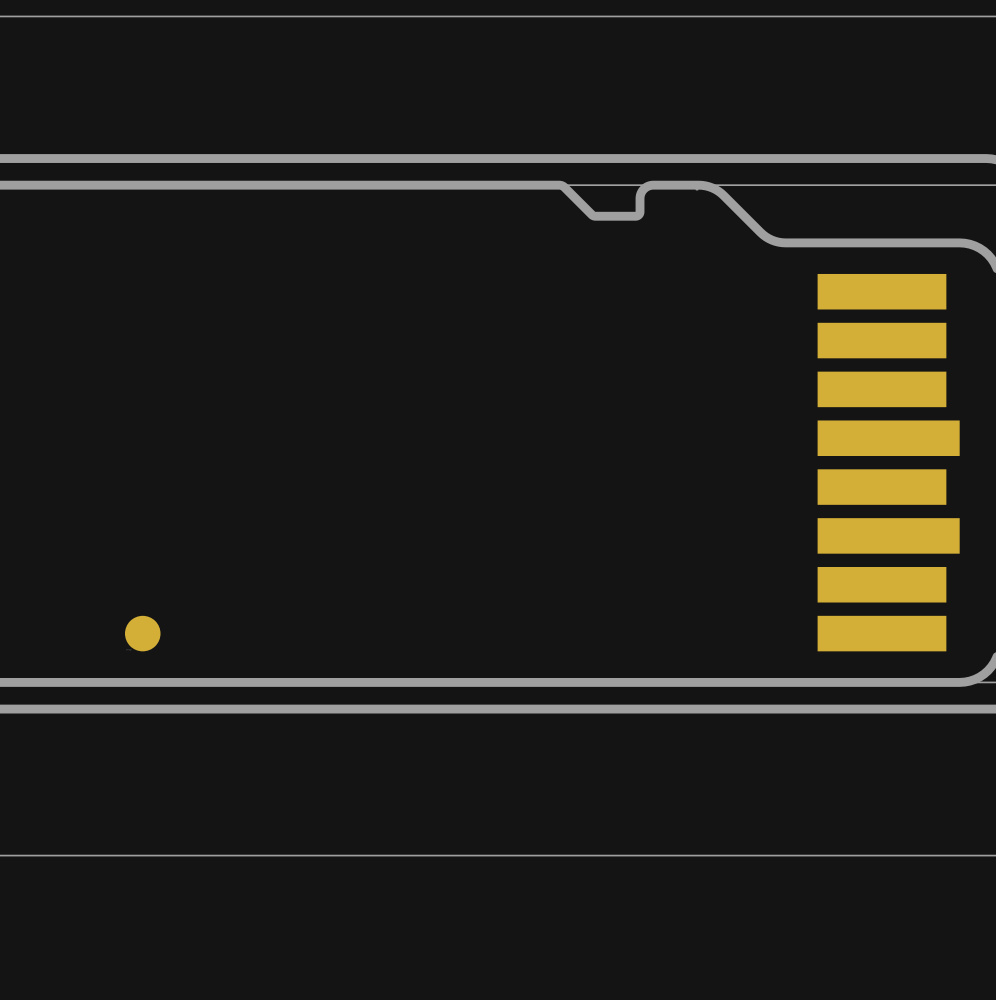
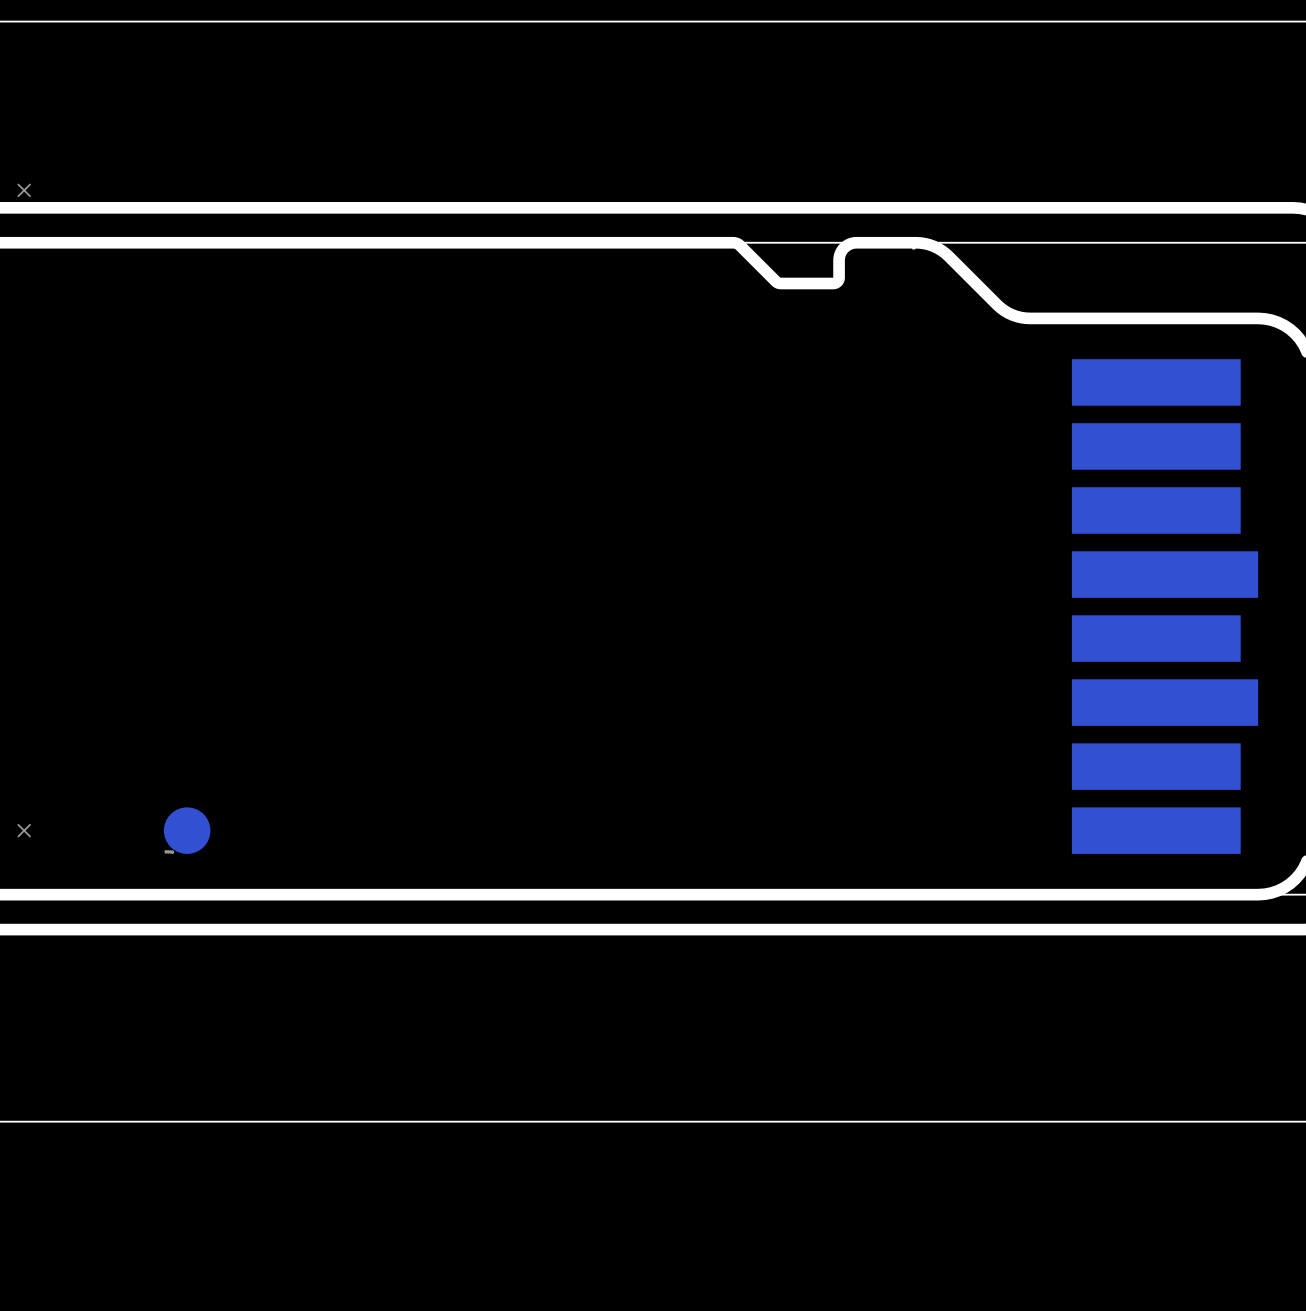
line: none -> (18, 184) (29, 196)
line: none -> (29, 184) (18, 196)
line: none -> (18, 824) (29, 836)
line: none -> (29, 824) (18, 836)

